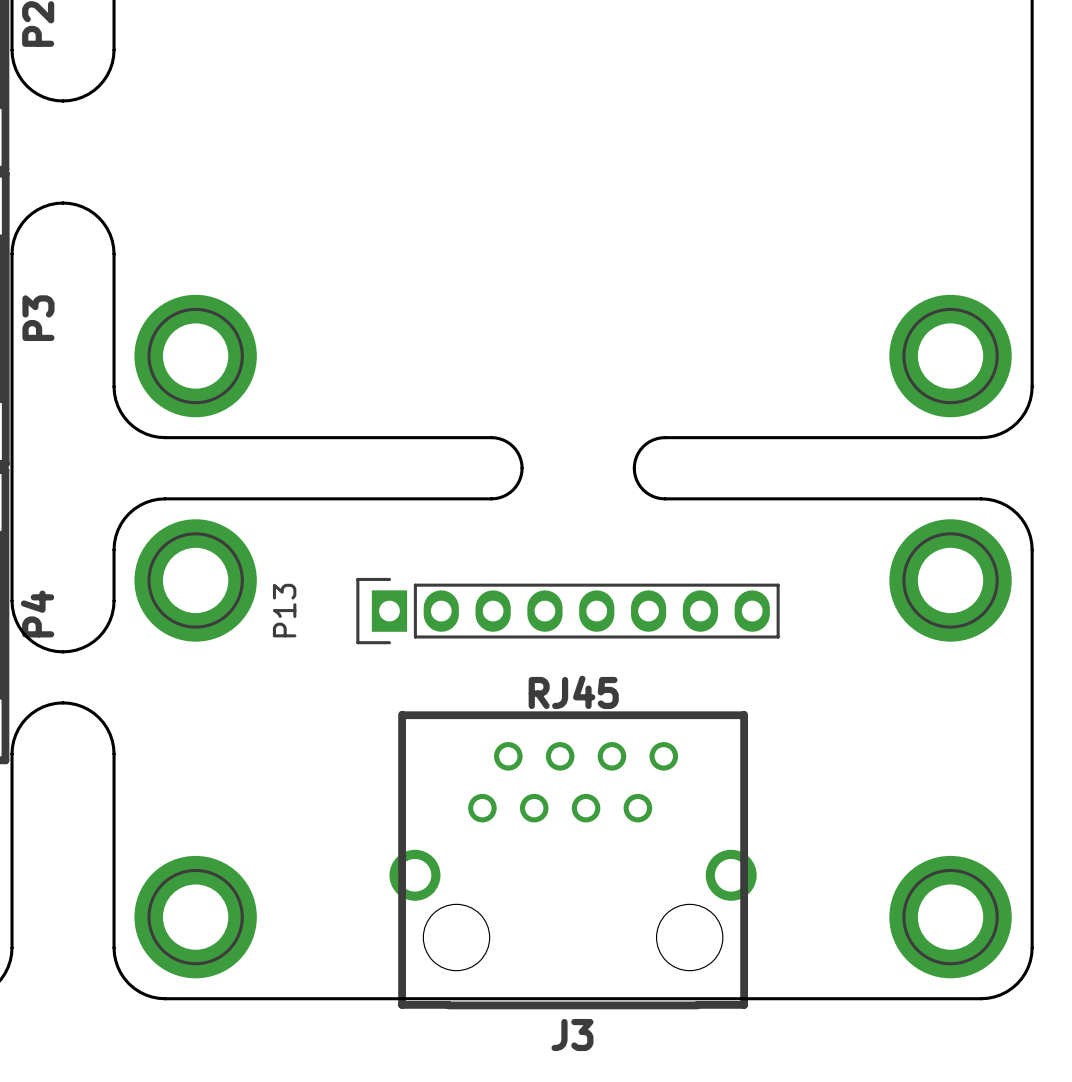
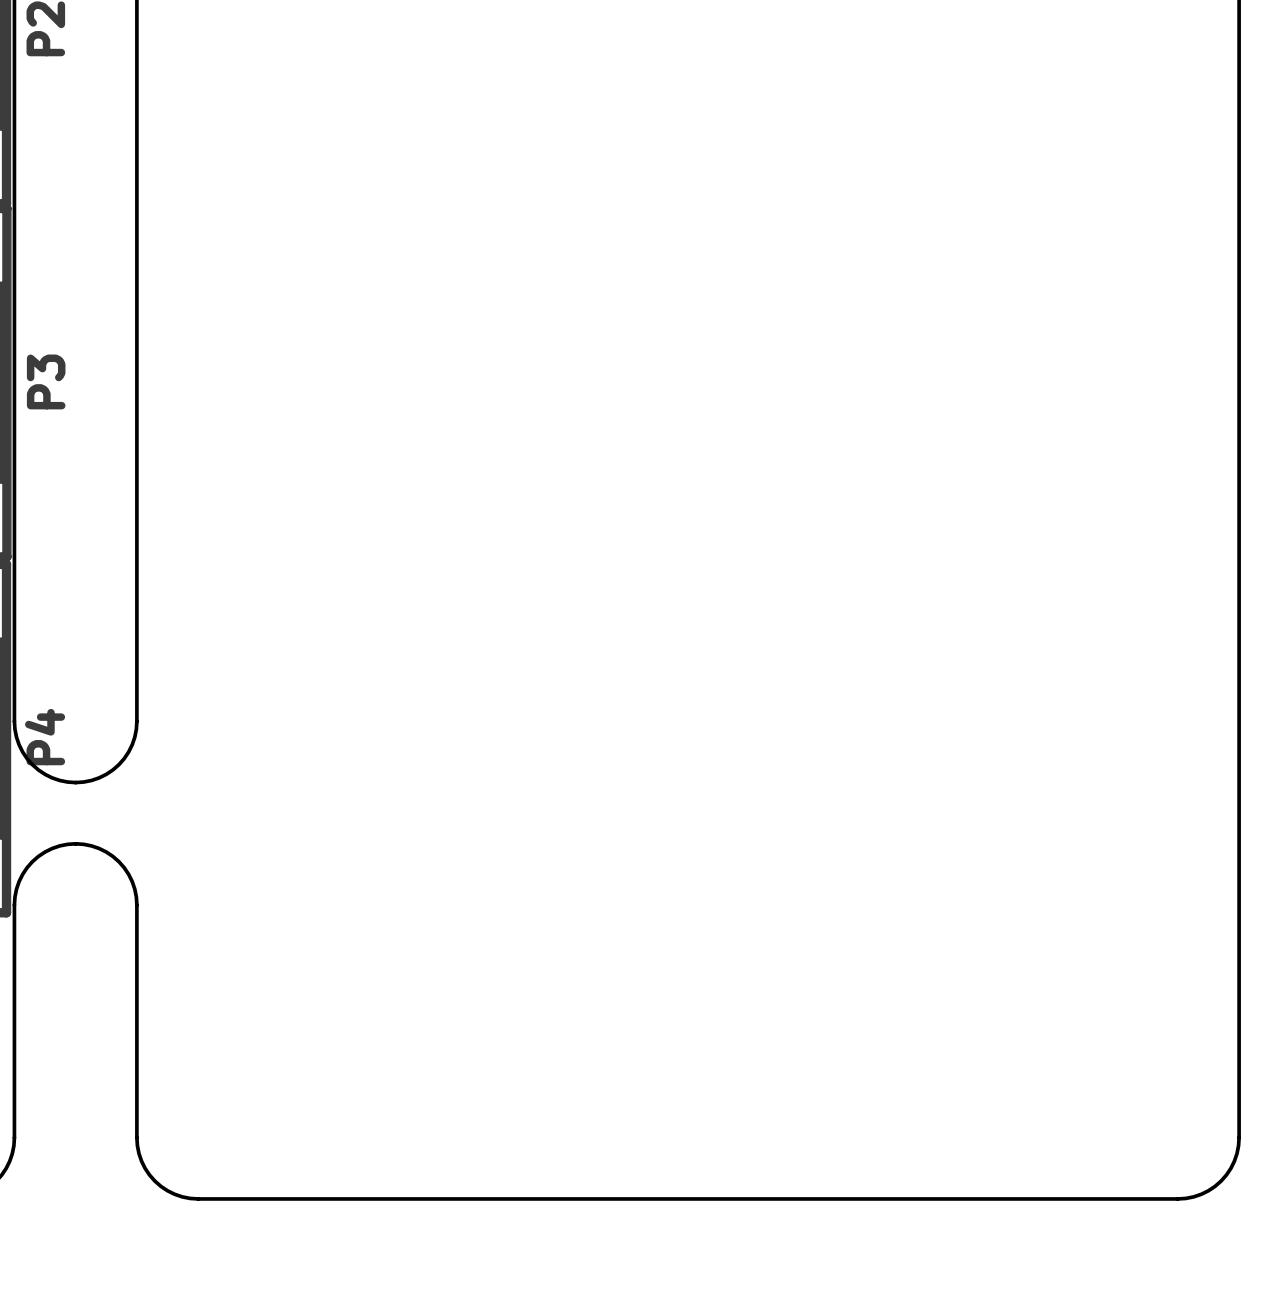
board edge: (12, 49) (15, 69) (26, 86) (43, 97) (63, 101) (82, 97) (99, 86) (110, 69) (114, 49) -> (14, 60) (14, 304)
board edge: (12, 254) (15, 234) (26, 217) (43, 206) (63, 203) (82, 206) (99, 217) (110, 234) (114, 254) -> (136, 60) (136, 304)
part: (195, 356) -> none
part: (950, 356) -> none
board edge: (114, 386) (115, 399) (124, 417) (133, 427) (151, 435) (165, 437) (495, 437) (506, 441) (515, 449) (521, 460) (522, 468) (521, 476) (515, 486) (506, 494) (495, 498) (165, 498) (151, 500) (133, 509) (124, 518) (115, 536) (114, 549) -> (136, 464) (136, 660)
board edge: (1032, 386) (1030, 399) (1021, 417) (1012, 427) (994, 435) (981, 437) (660, 437) (649, 441) (640, 449) (635, 460) (634, 468) (635, 476) (640, 486) (649, 494) (660, 498) (981, 498) (994, 500) (1012, 509) (1021, 518) (1030, 536) (1032, 549) -> (1239, 464) (1239, 660)
part: (195, 580) -> none
part: (950, 580) -> none
P13: (567, 611) -> none
J3: RJ45 (573, 860) -> none
part: (195, 917) -> none
part: (950, 917) -> none

